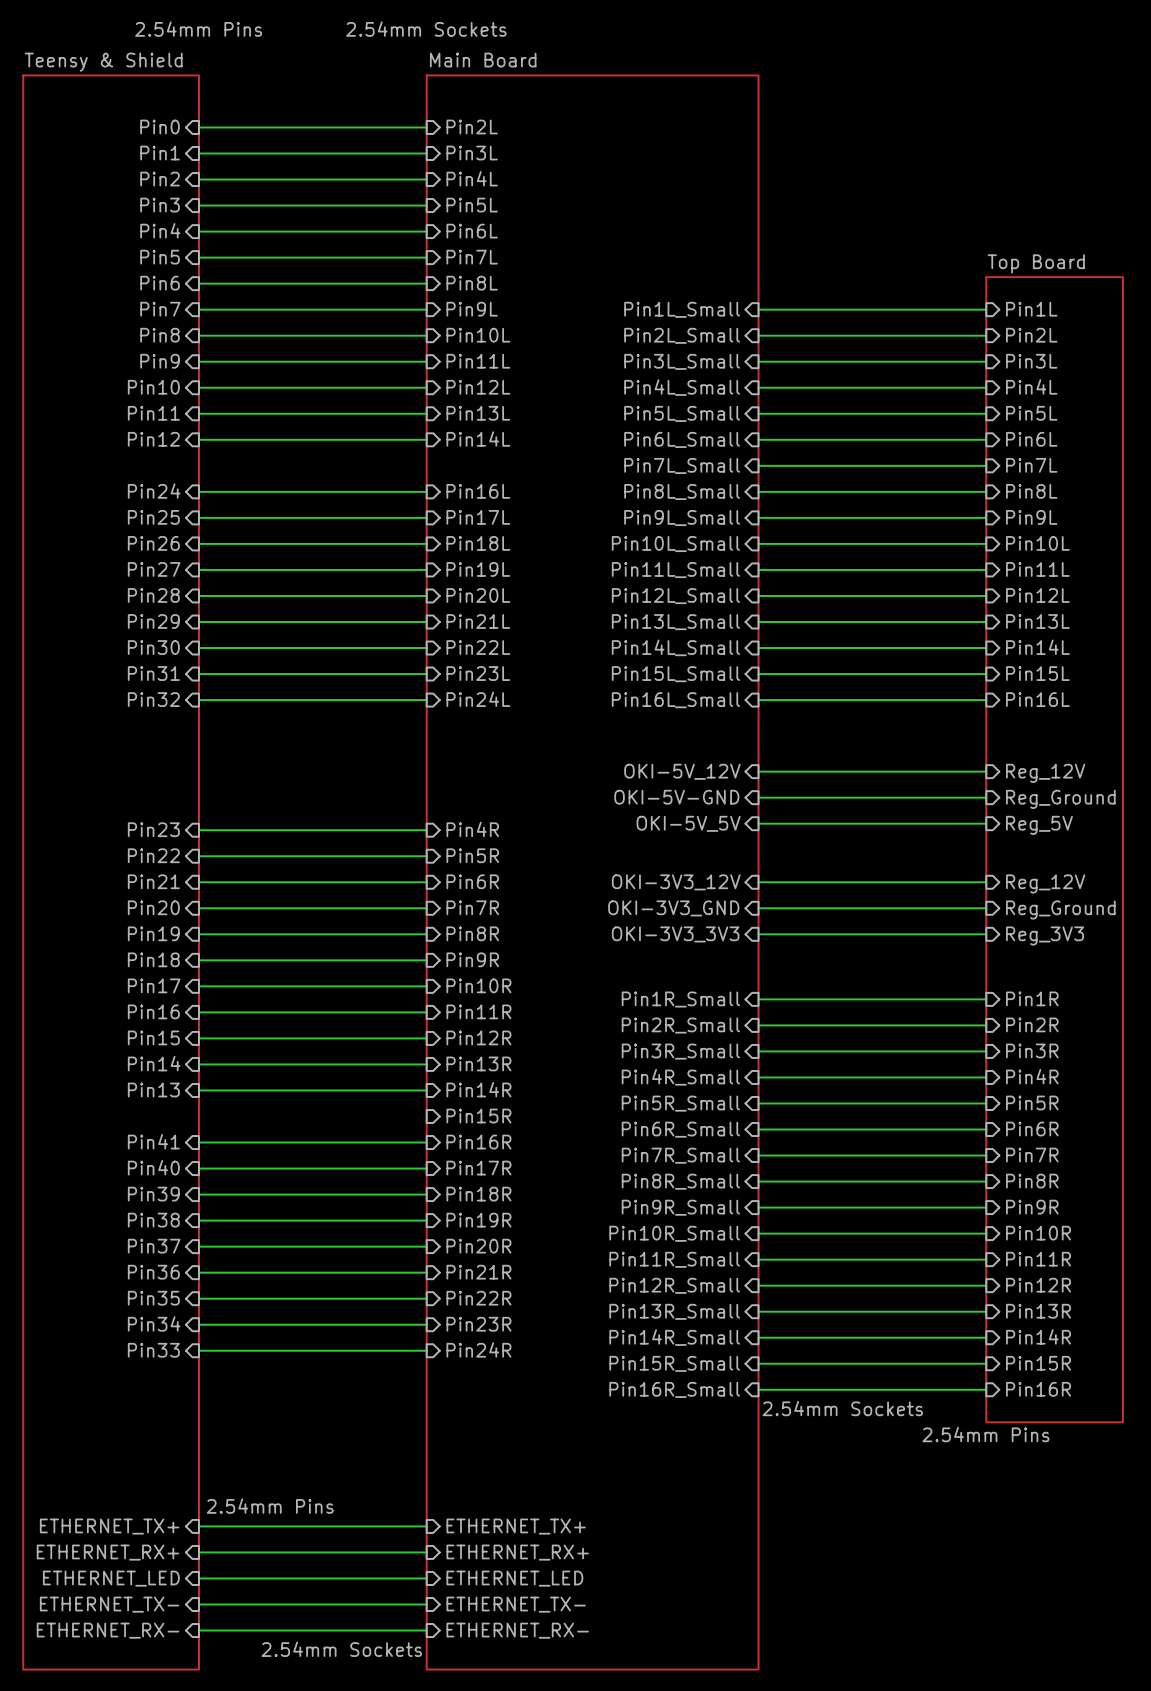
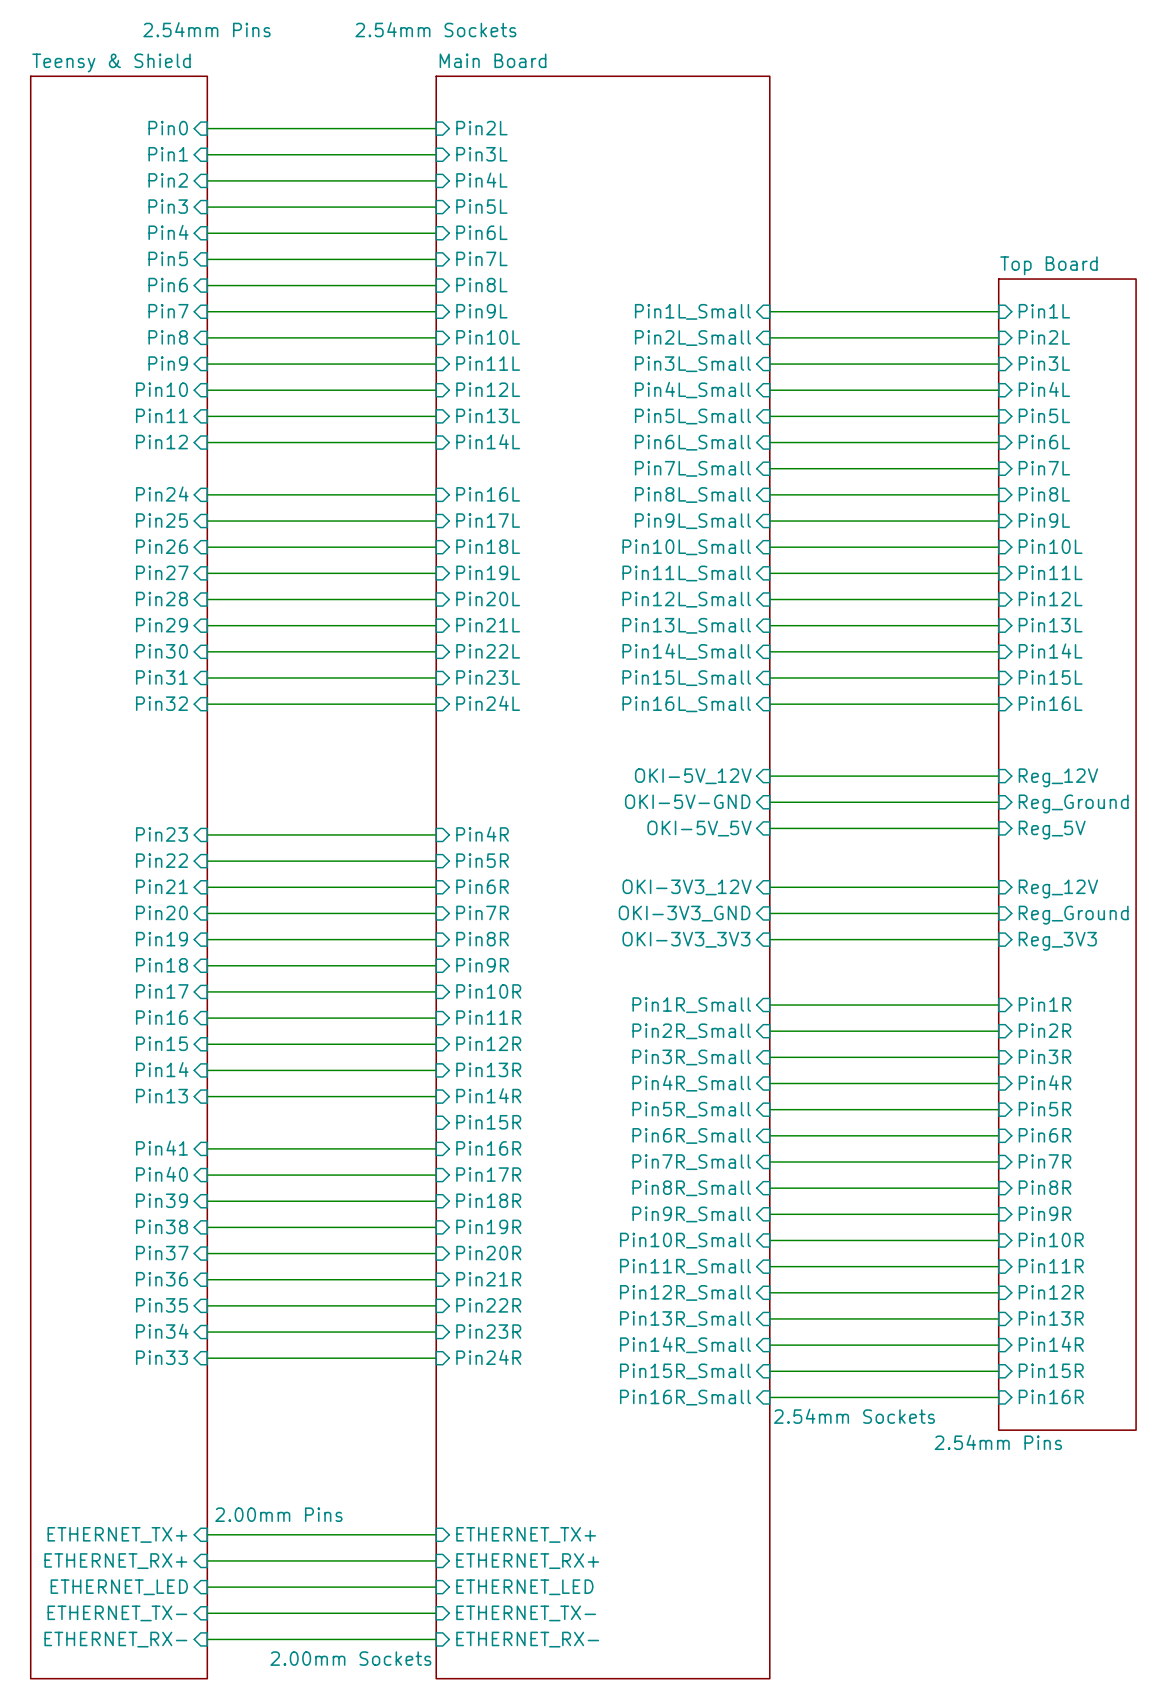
sheet Teensy & Shield text: 2.54mm Pins (270, 1506) -> 2.00mm Pins (278, 1514)
sheet Main Board text: 2.54mm Sockets (341, 1649) -> 2.00mm Sockets (350, 1658)

